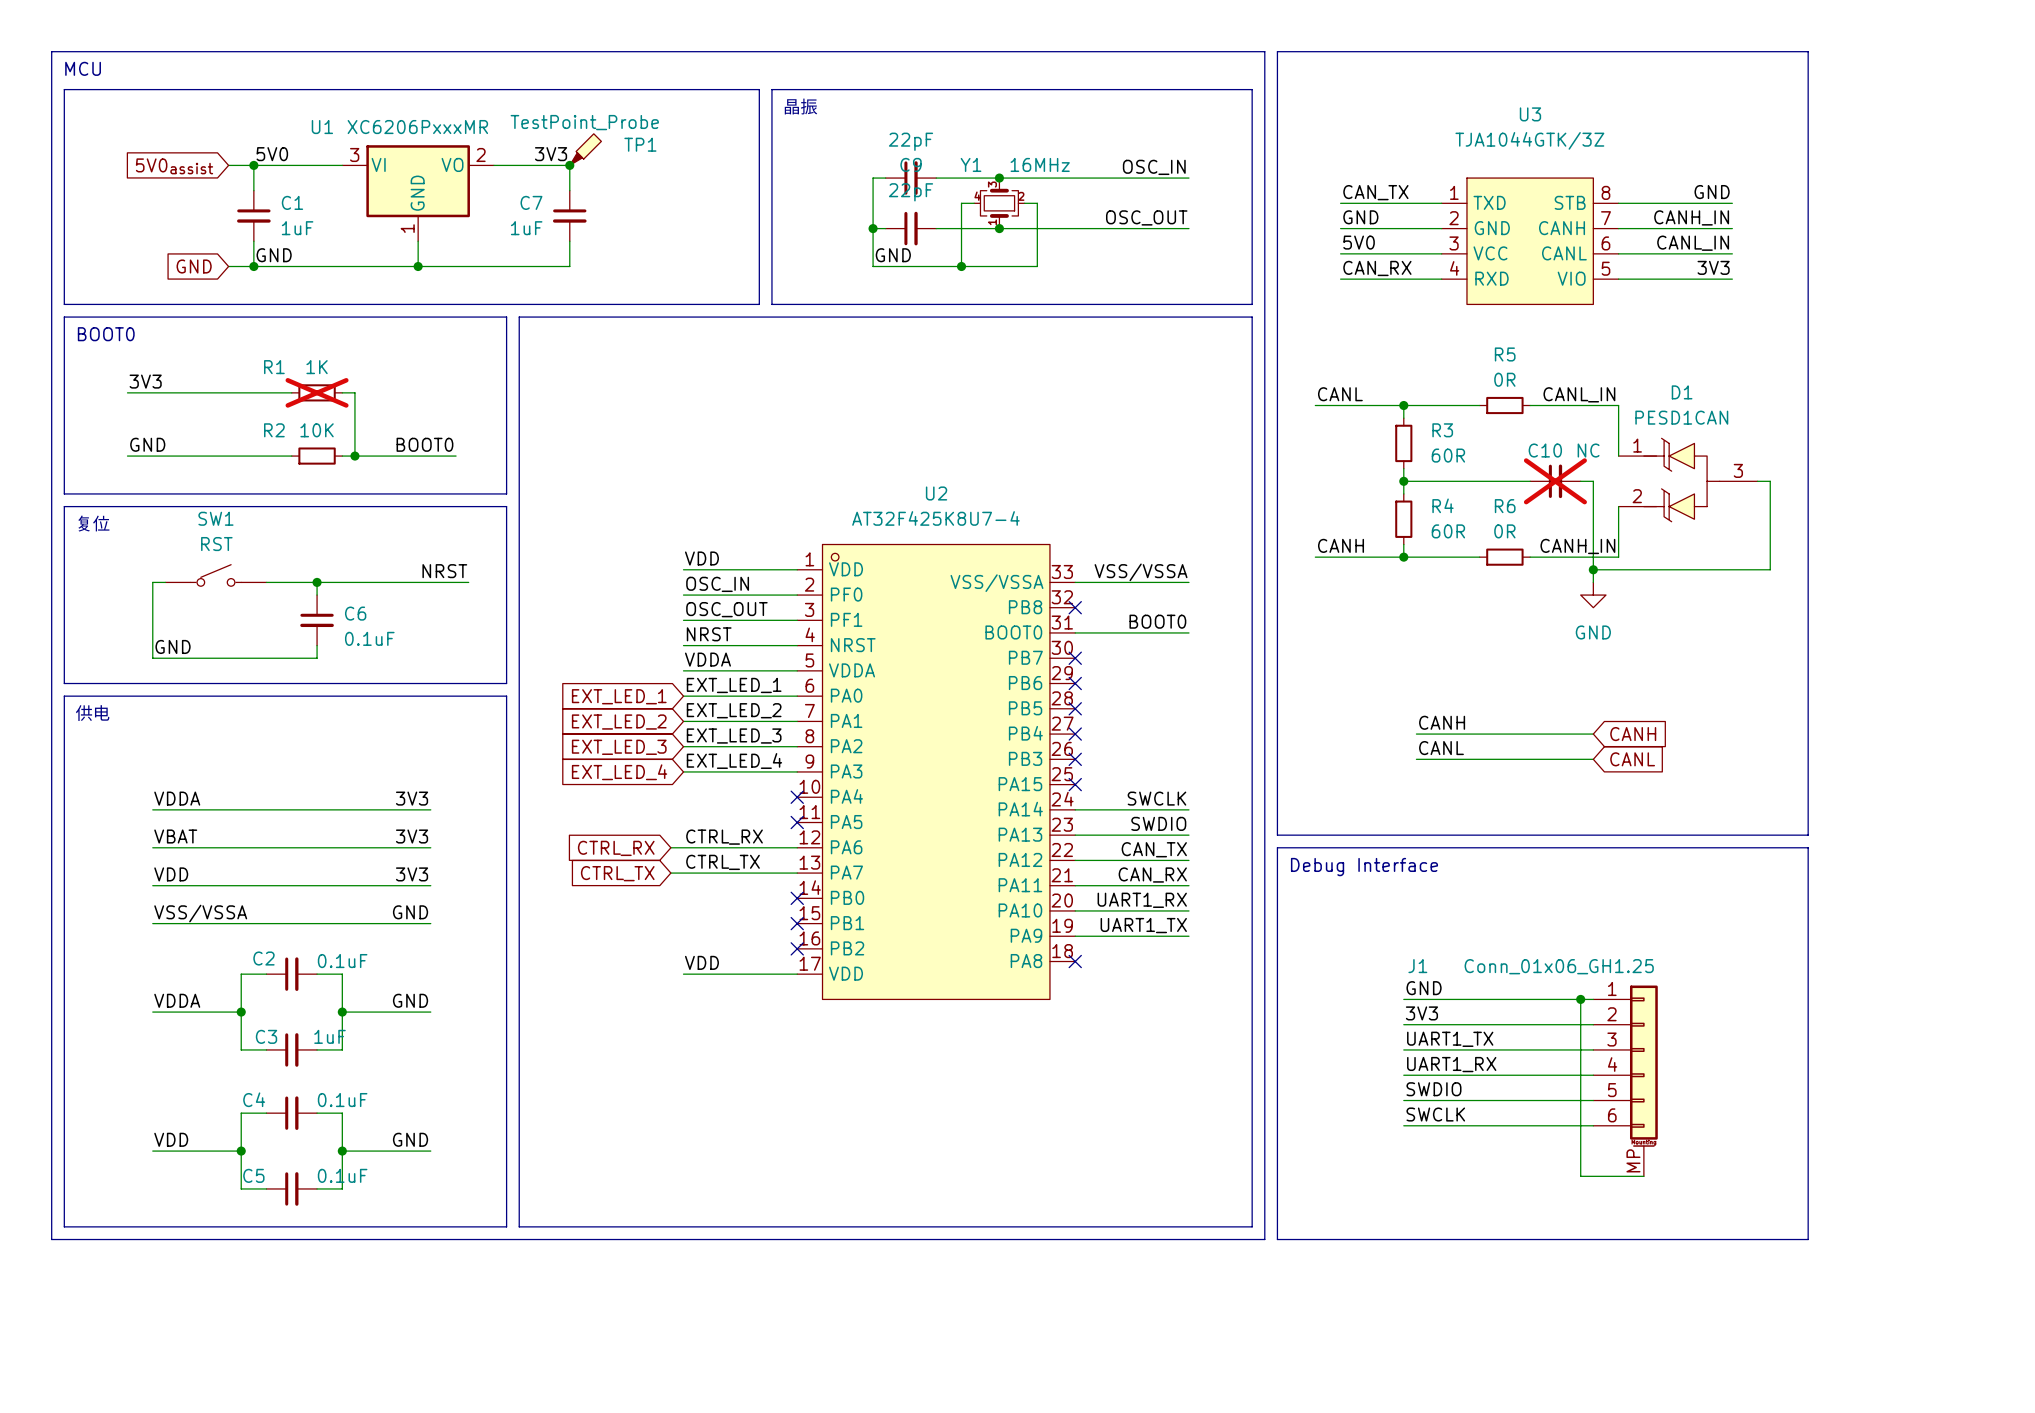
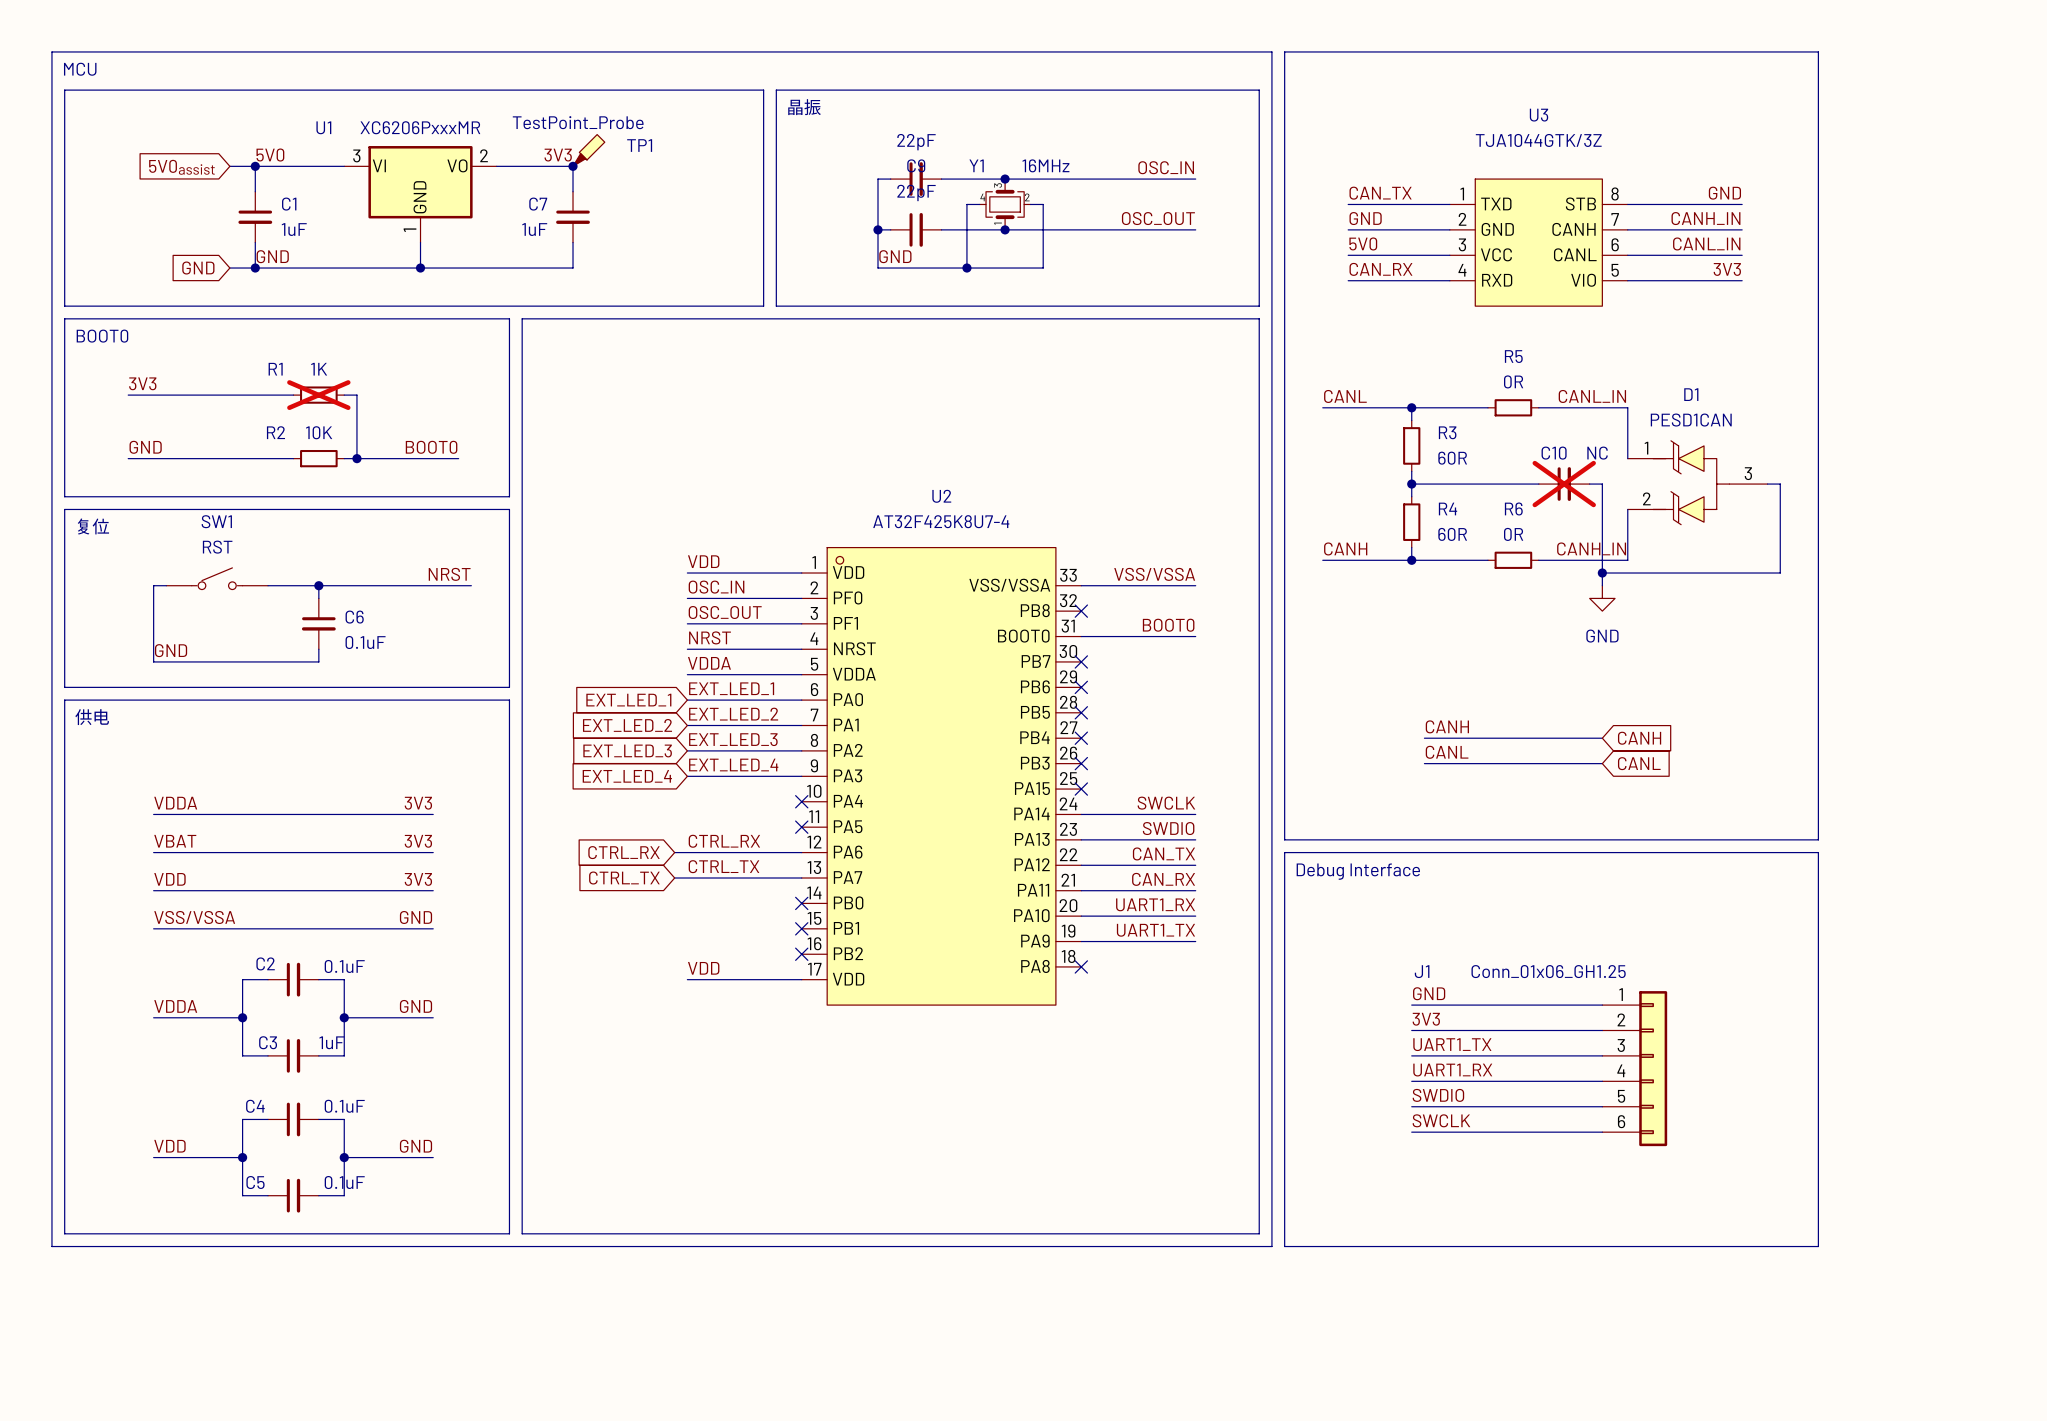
J1 symbol: [1593, 985, 1658, 1177] -> [1602, 991, 1668, 1147]
wire: (1580, 999) (1580, 1176) (1643, 1176) -> none
junction: (1580, 999) -> none

